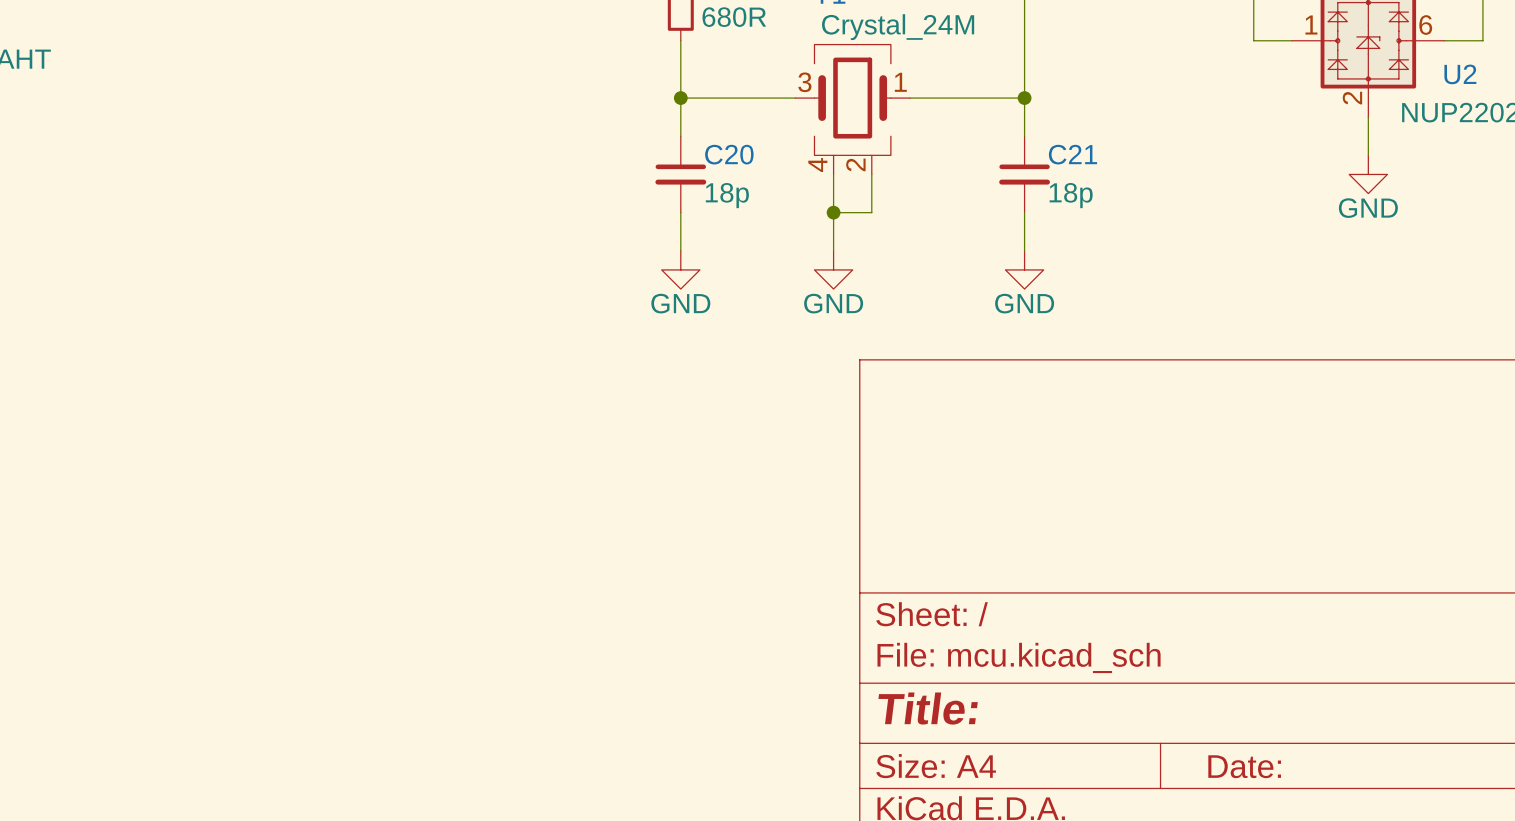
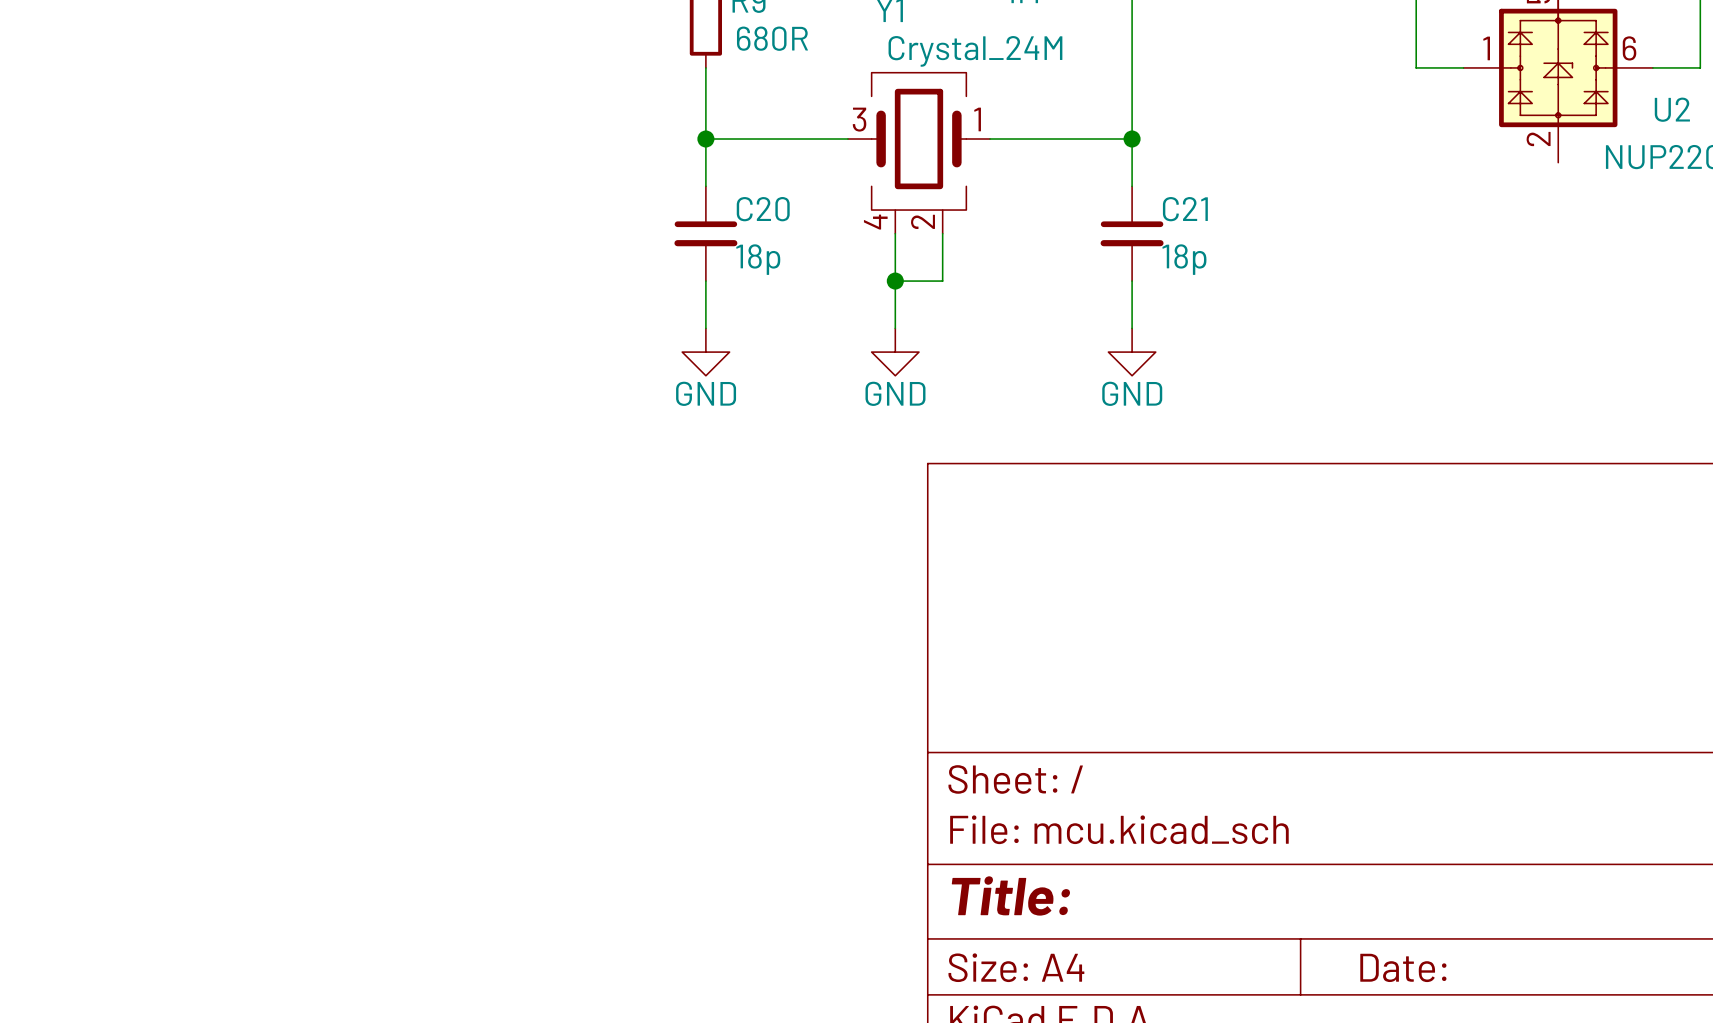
wire: (1368, 117) (1368, 155) -> none
power symbol: GND (1368, 174) -> none

